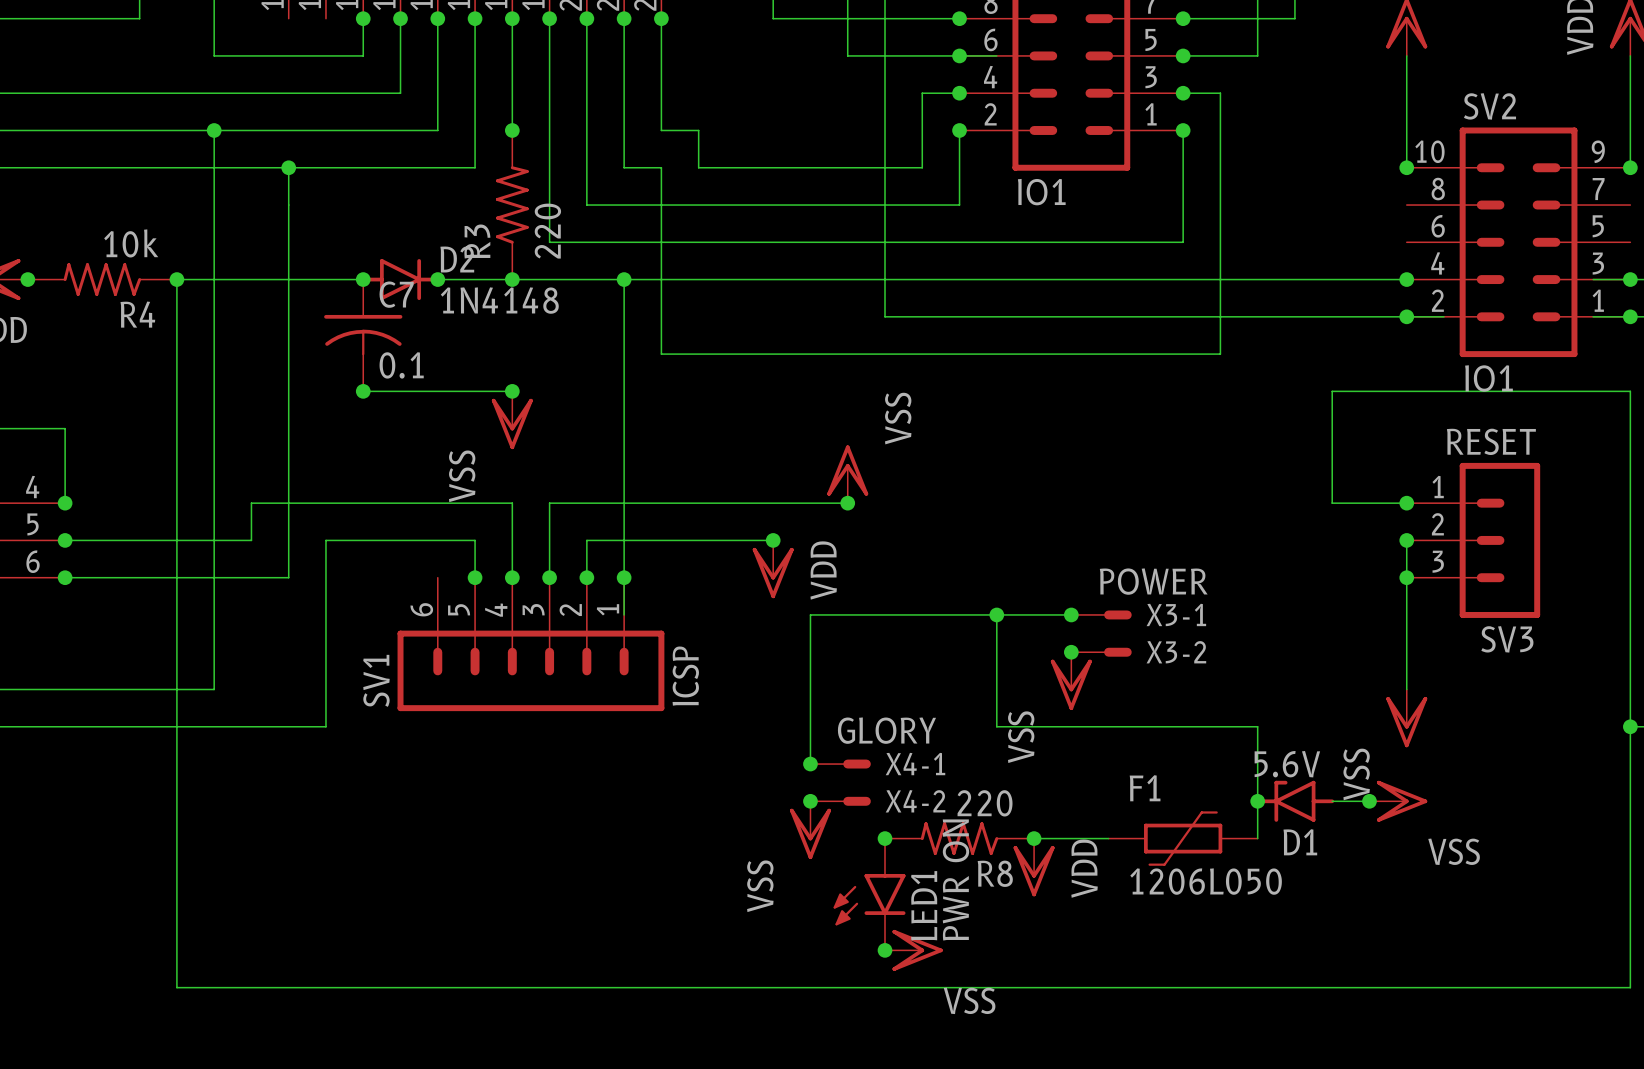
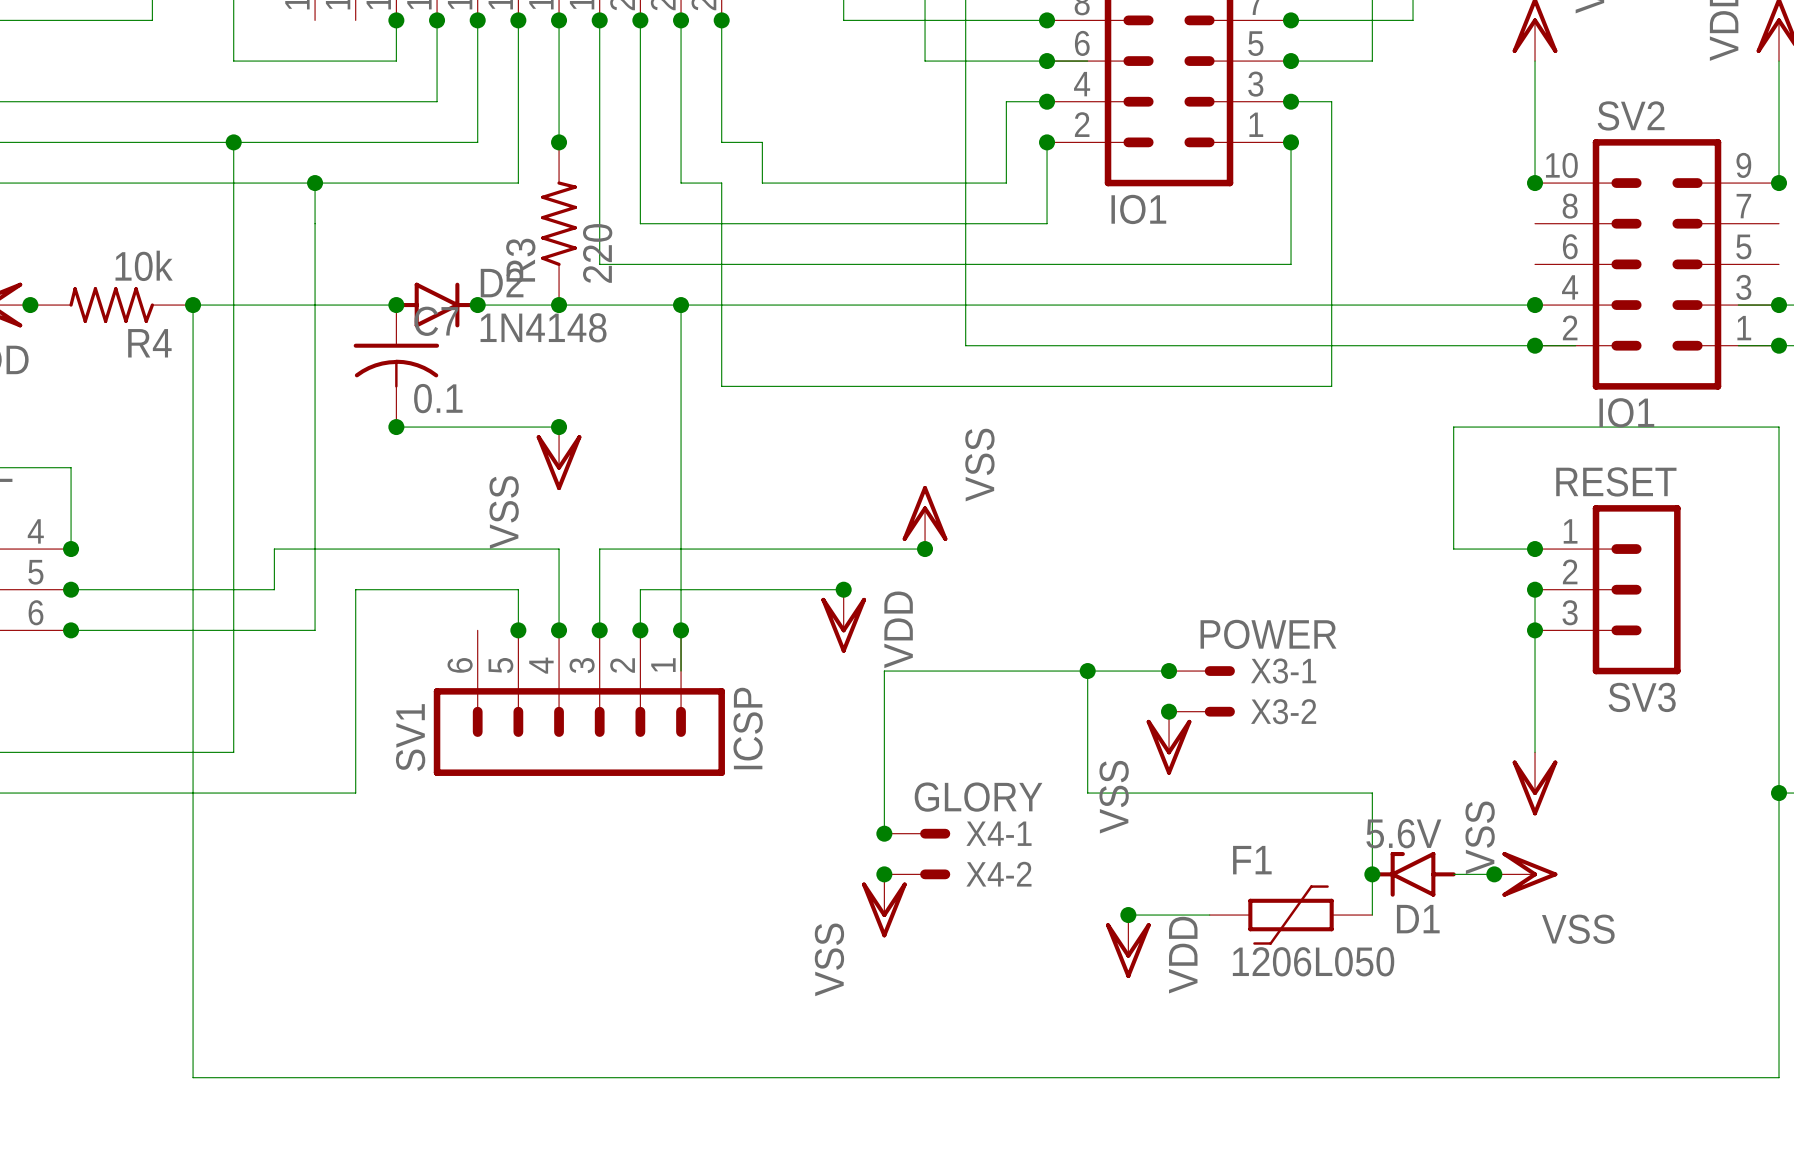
junction: (885, 838) -> none
R8: 220 (959, 838) -> none
LED1: PWR ON (869, 894) -> none
junction: (885, 950) -> none
power symbol: VSS (913, 950) -> none

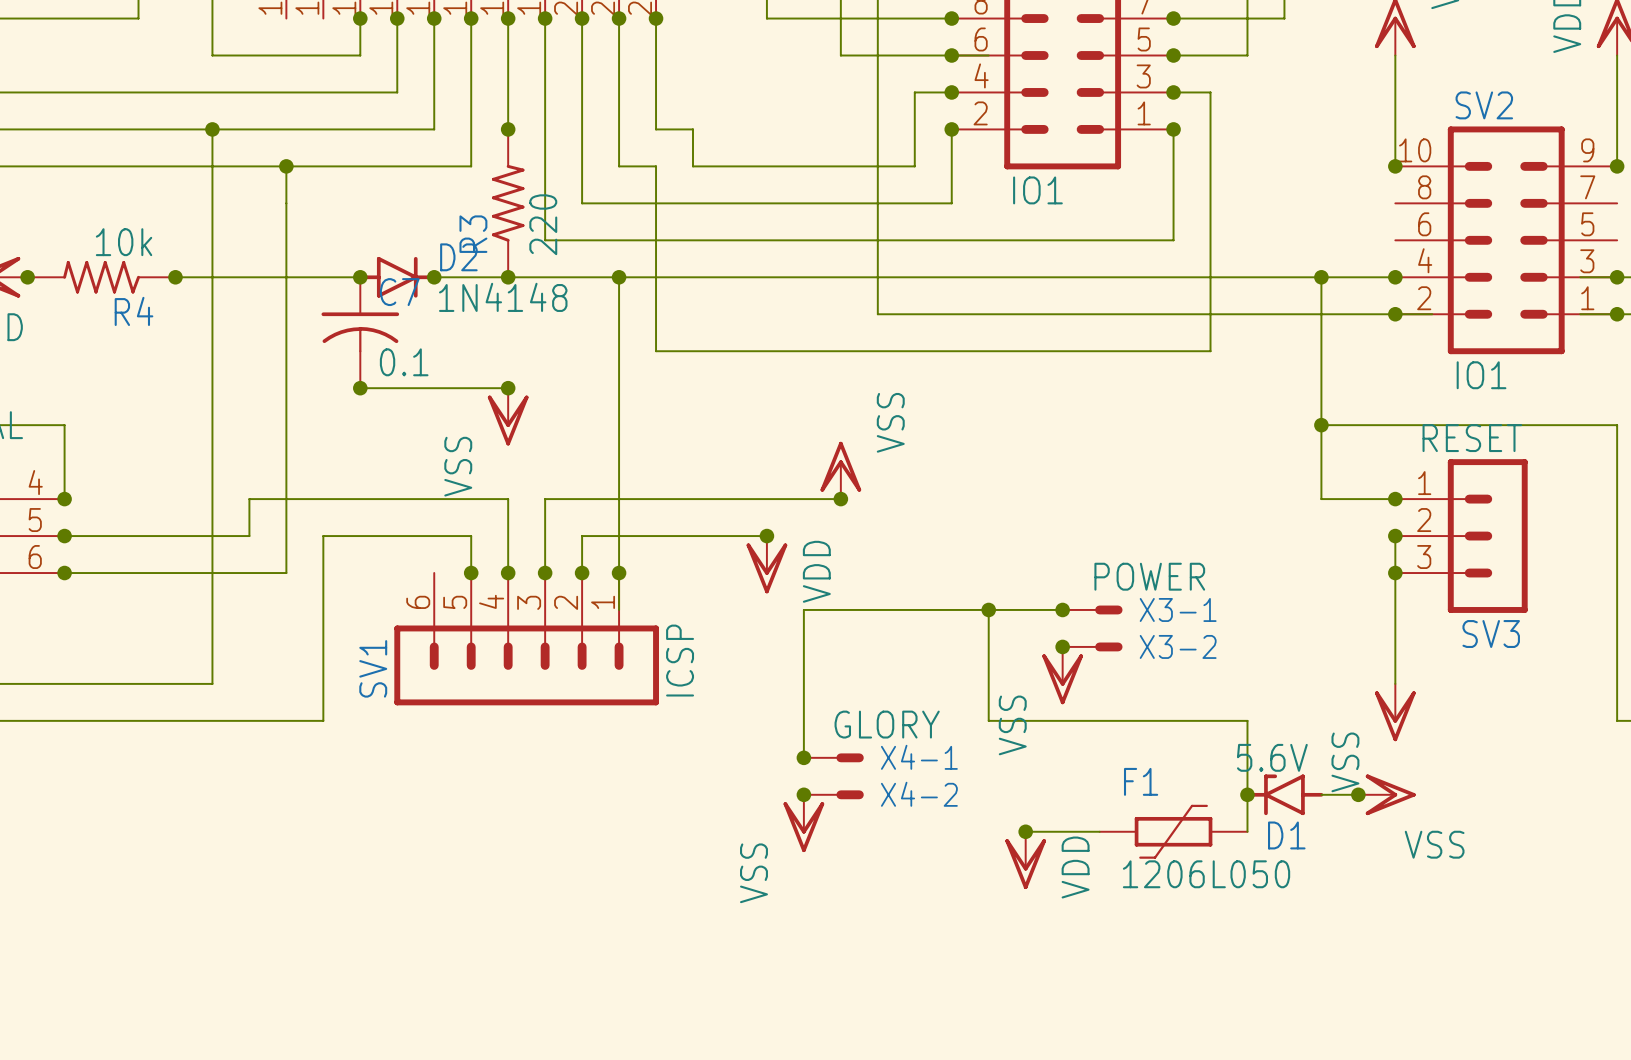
wire: (193, 305) (193, 1077) (1779, 1077) (1779, 793) -> none
wire: none -> (1321, 277) (1321, 388)
junction: none -> (1321, 277)
wire: (1453, 427) (1779, 427) (1779, 467) -> (1321, 425) (1617, 425)
junction: none -> (1321, 425)
junction: (1779, 793) -> none

